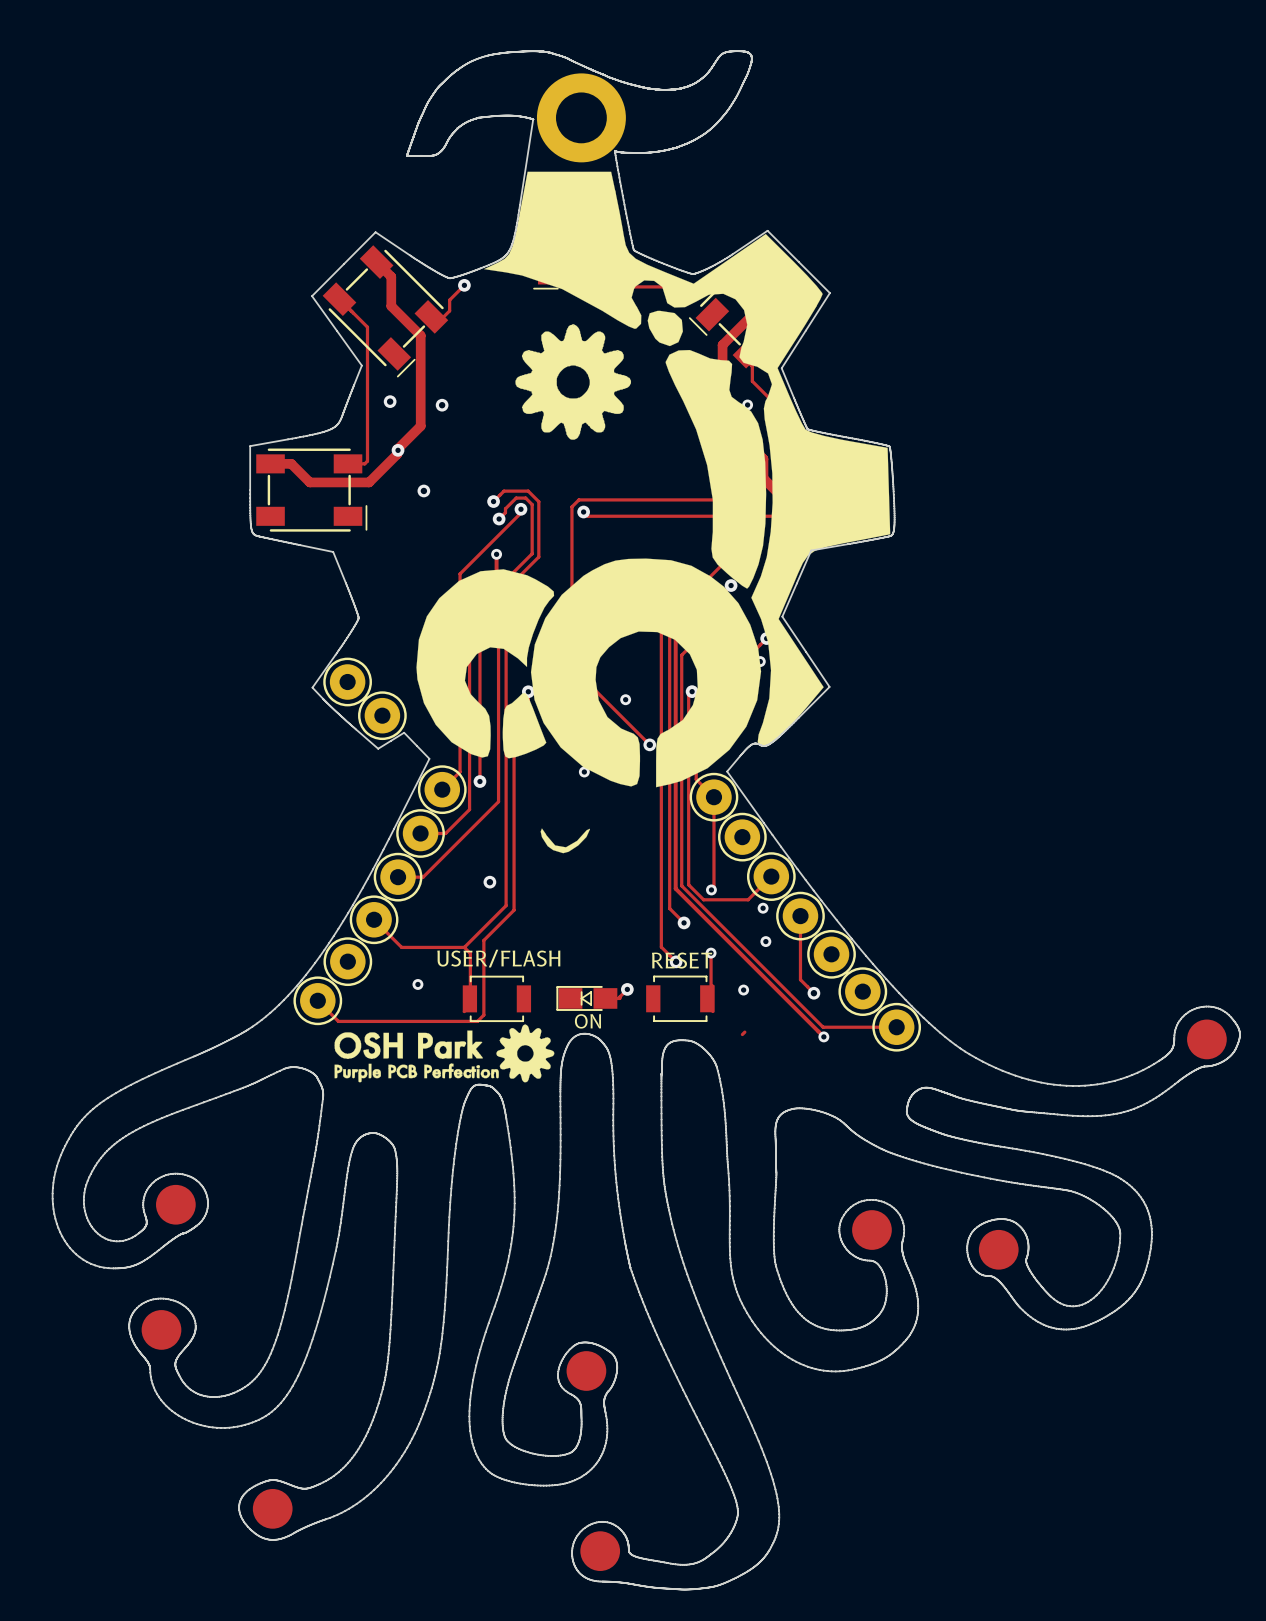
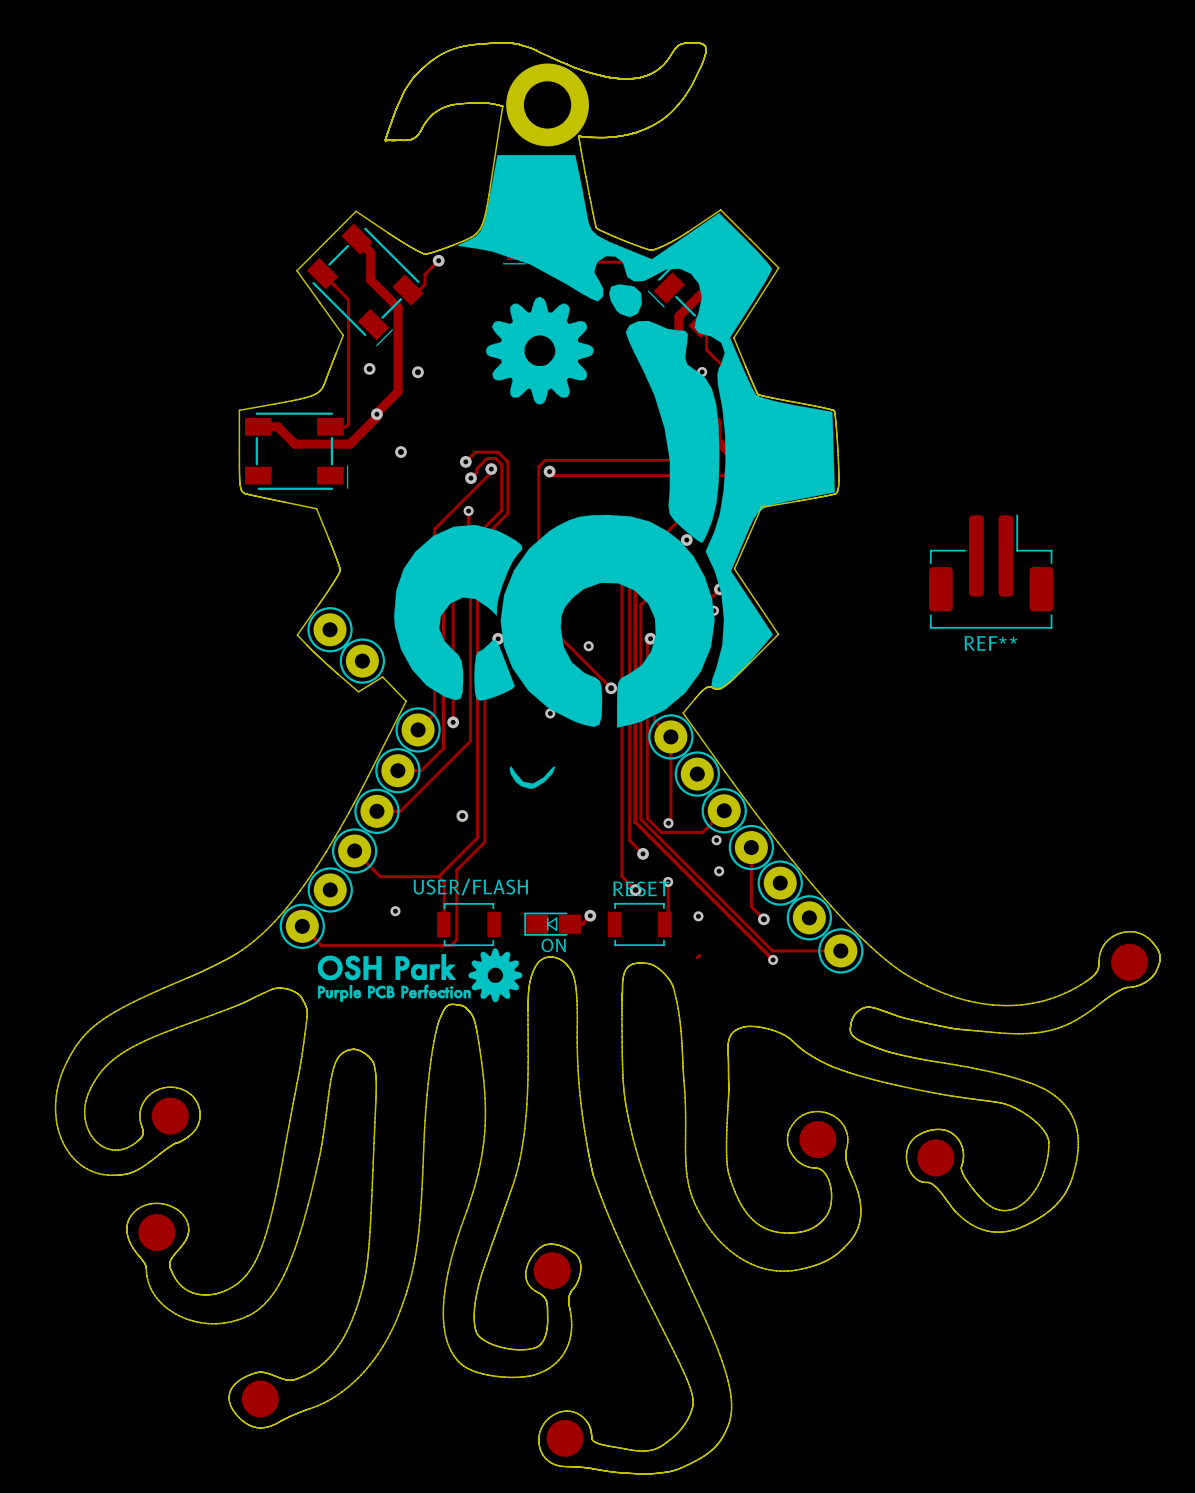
REF**: none -> (991, 571)

